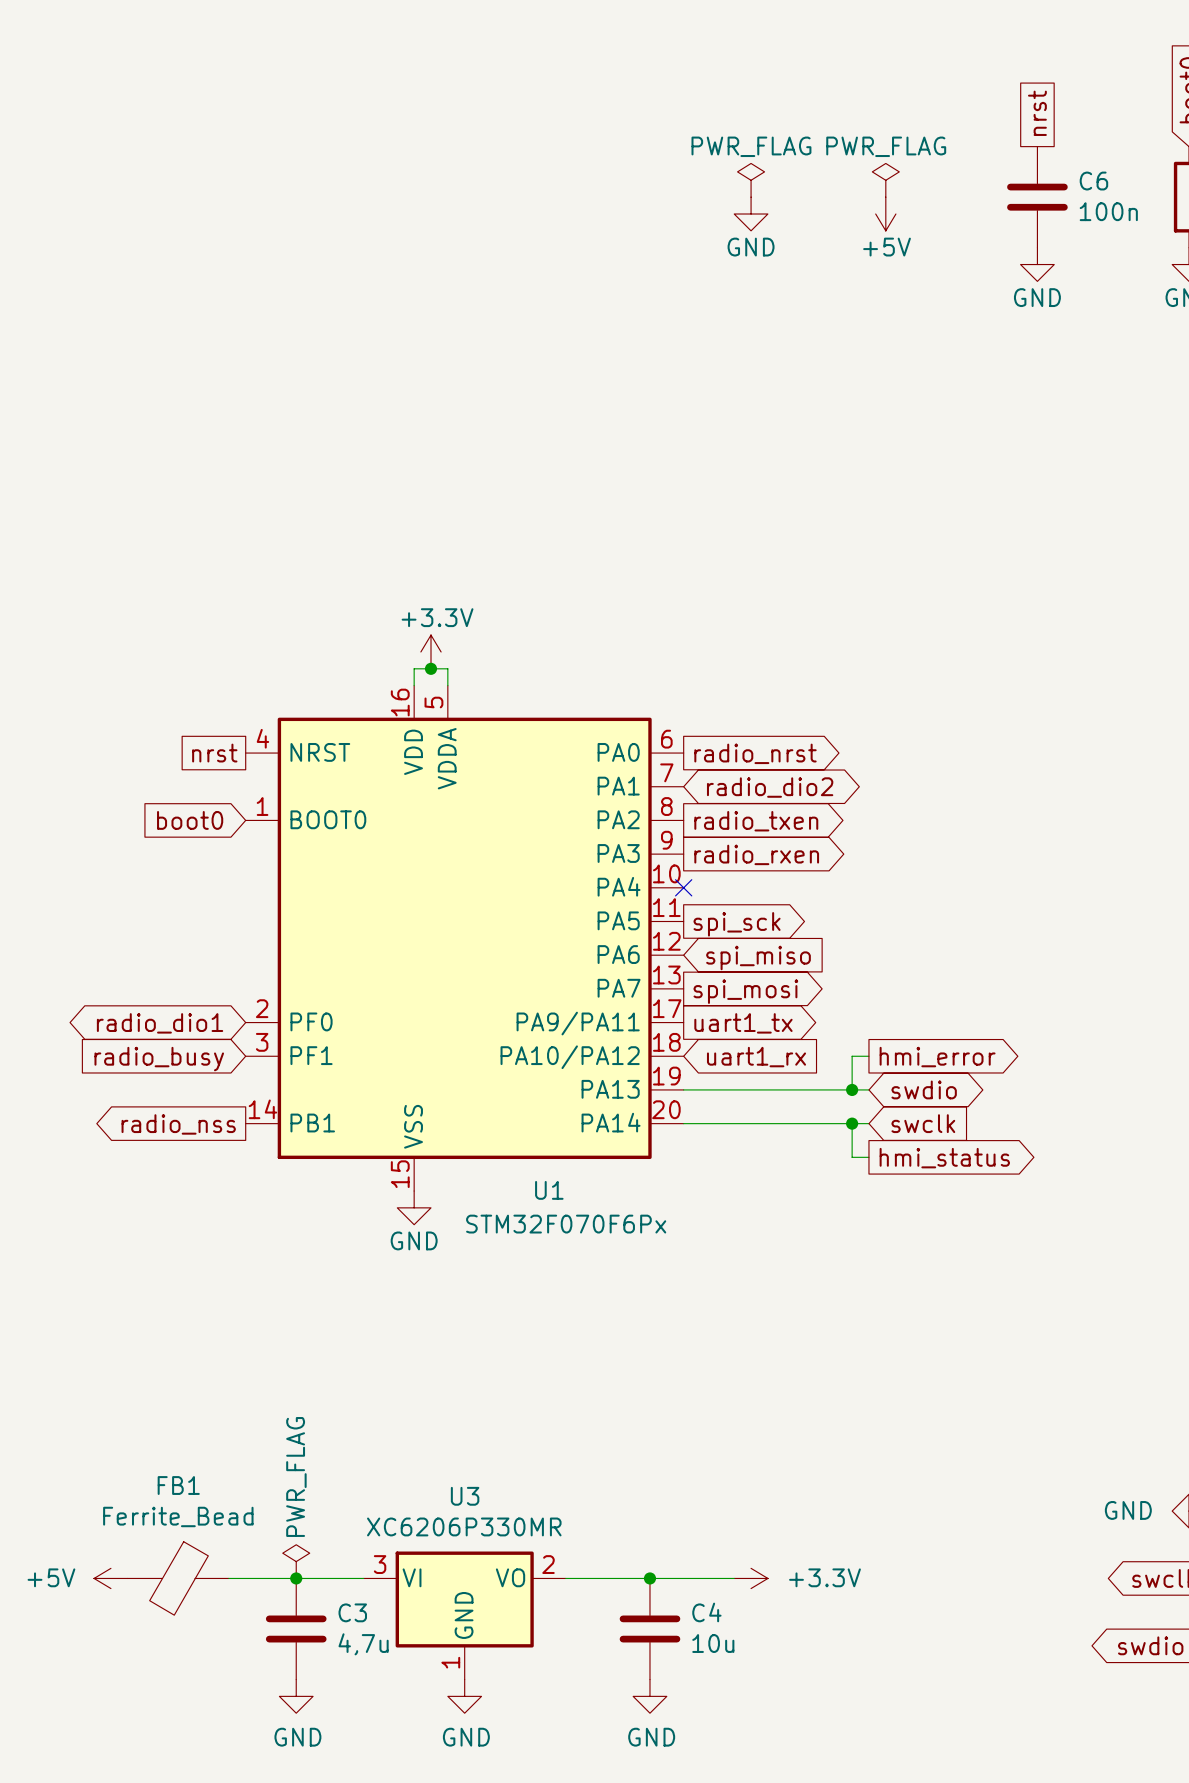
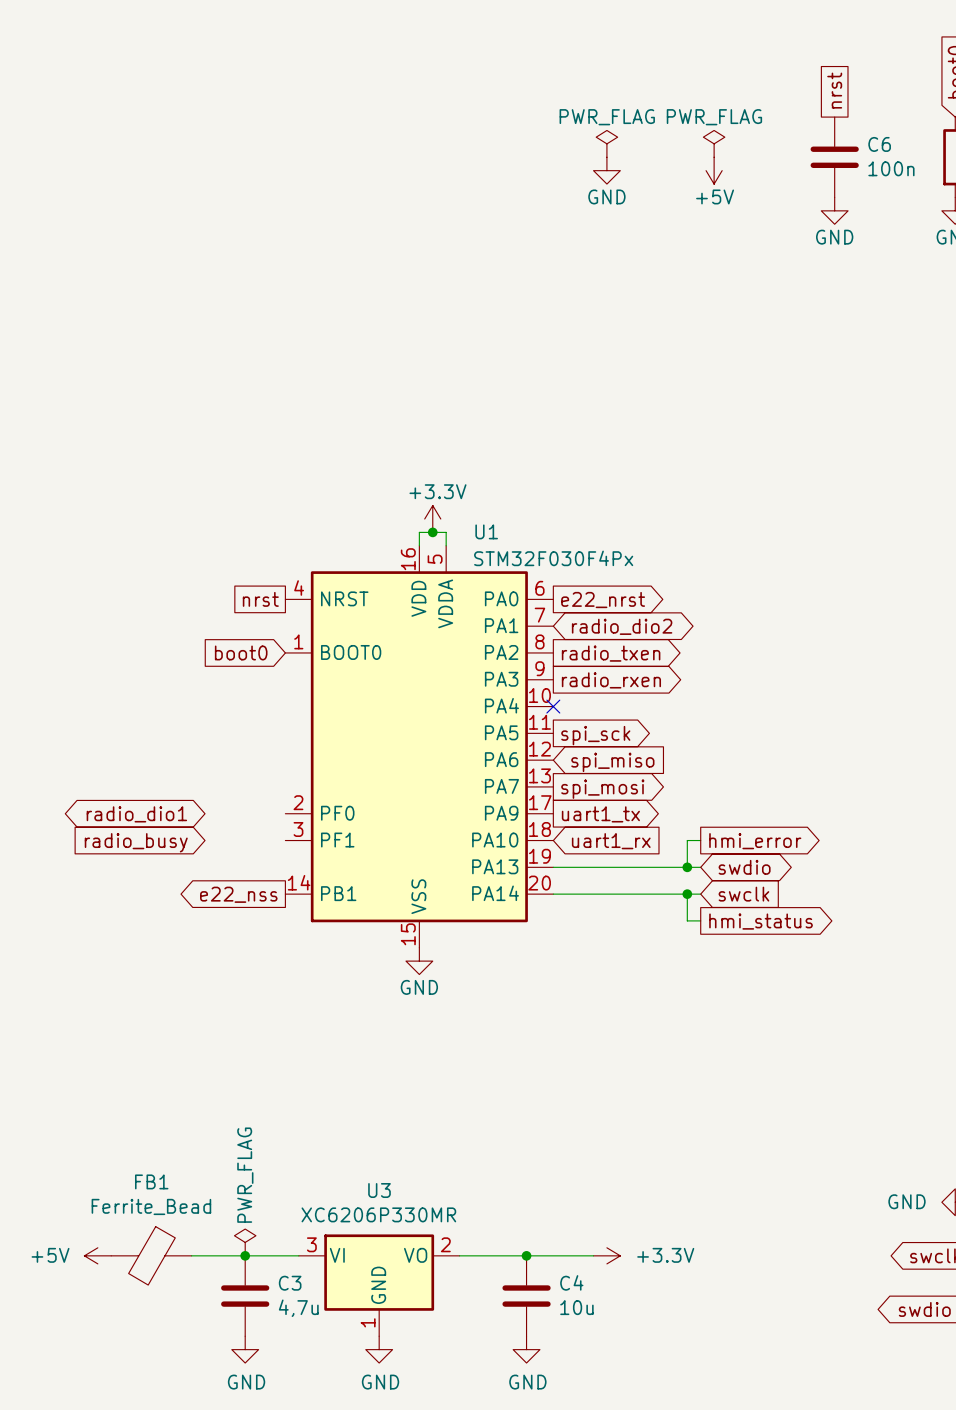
power symbol position: +3.3V (431, 651) -> +3.3V (432, 519)
junction: (431, 668) -> none
junction: none -> (432, 532)
U1 symbol: [245, 685, 684, 1192] -> [285, 545, 554, 948]
wire: (414, 685) (414, 668) (447, 668) (447, 685) -> (419, 545) (419, 532) (446, 532) (446, 545)
global label position: nrst (214, 753) -> nrst (260, 599)
global label: radio_nrst (755, 753) -> e22_nrst (603, 600)
global label position: boot0 (190, 820) -> boot0 (241, 652)
global label: radio_nss (178, 1124) -> none
global label: none -> e22_nss (238, 894)
U1 name position: U1 (549, 1190) -> U1 (486, 531)
power symbol position: GND (414, 1207) -> GND (419, 961)
U1 value: STM32F070F6Px (566, 1224) -> STM32F030F4Px (553, 558)

